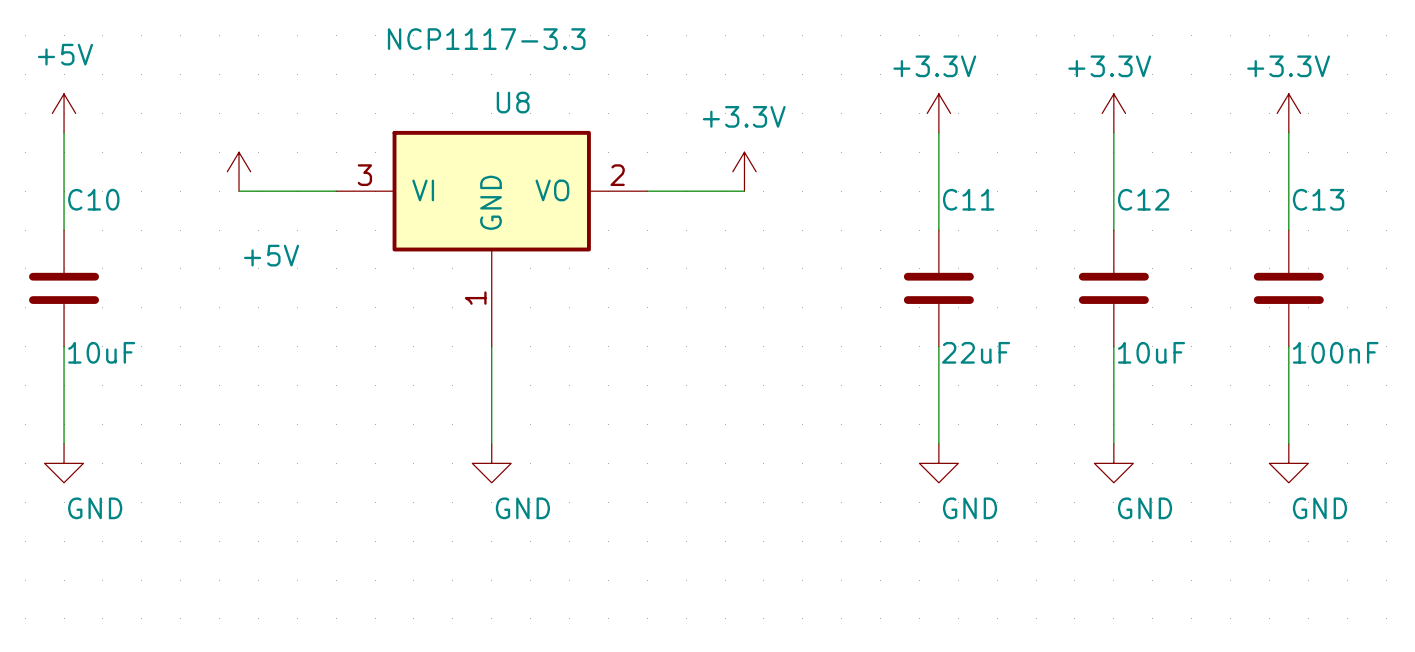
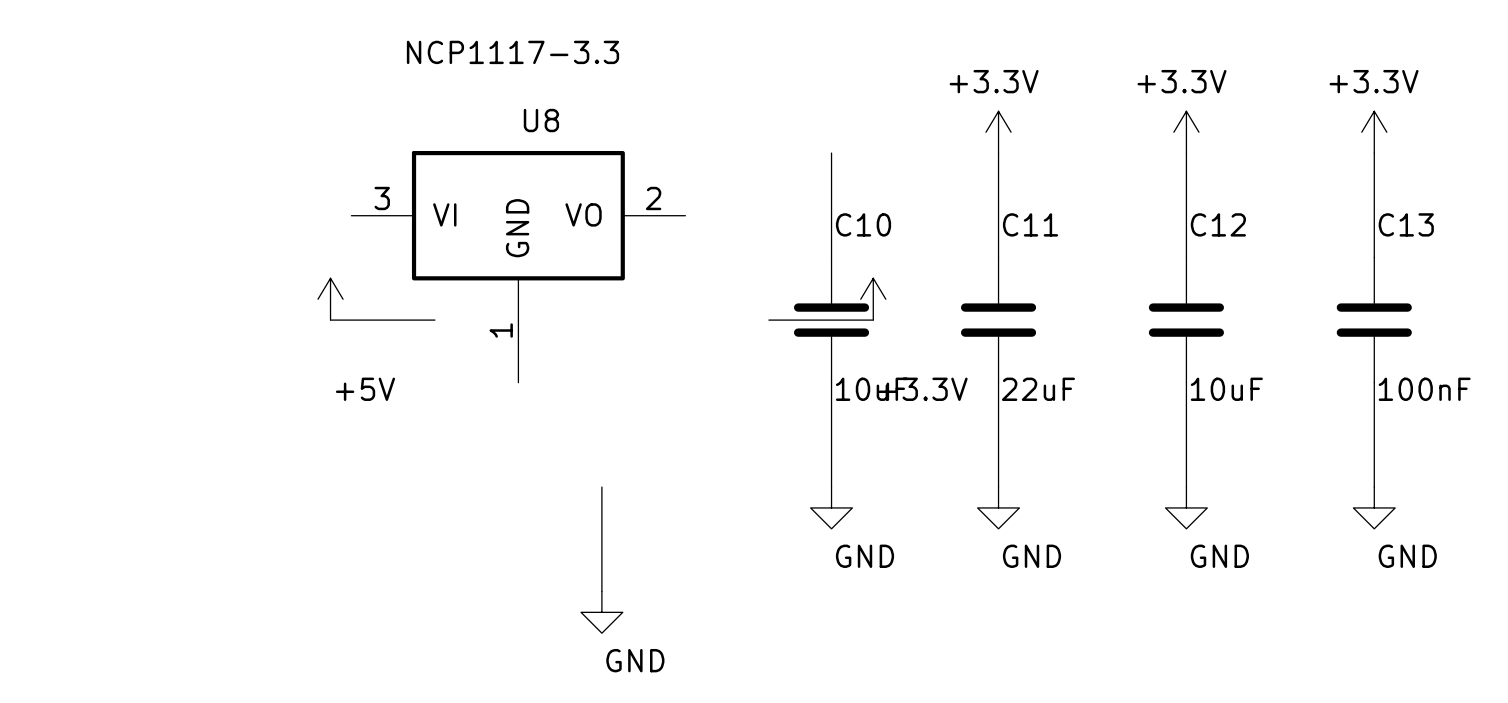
power symbol: +5V (64, 113) -> none
power symbol text position: +3.3V (744, 116) -> +3.3V (923, 389)
wire: (64, 132) (64, 230) -> none
wire: none -> (831, 153) (831, 257)
power symbol position: +5V (239, 171) -> +5V (330, 299)
power symbol position: +3.3V (744, 171) -> +3.3V (873, 299)
wire: (239, 191) (336, 191) -> (330, 320) (434, 320)
wire: (647, 191) (744, 191) -> (768, 320) (873, 320)
C10 position: (64, 288) -> (831, 320)
wire: (64, 346) (64, 443) -> none
wire: (491, 346) (491, 443) -> (601, 487) (601, 591)
wire: none -> (831, 382) (831, 487)
power symbol: GND (64, 463) -> none
power symbol position: GND (491, 463) -> GND (601, 612)
power symbol: none -> GND (831, 507)

